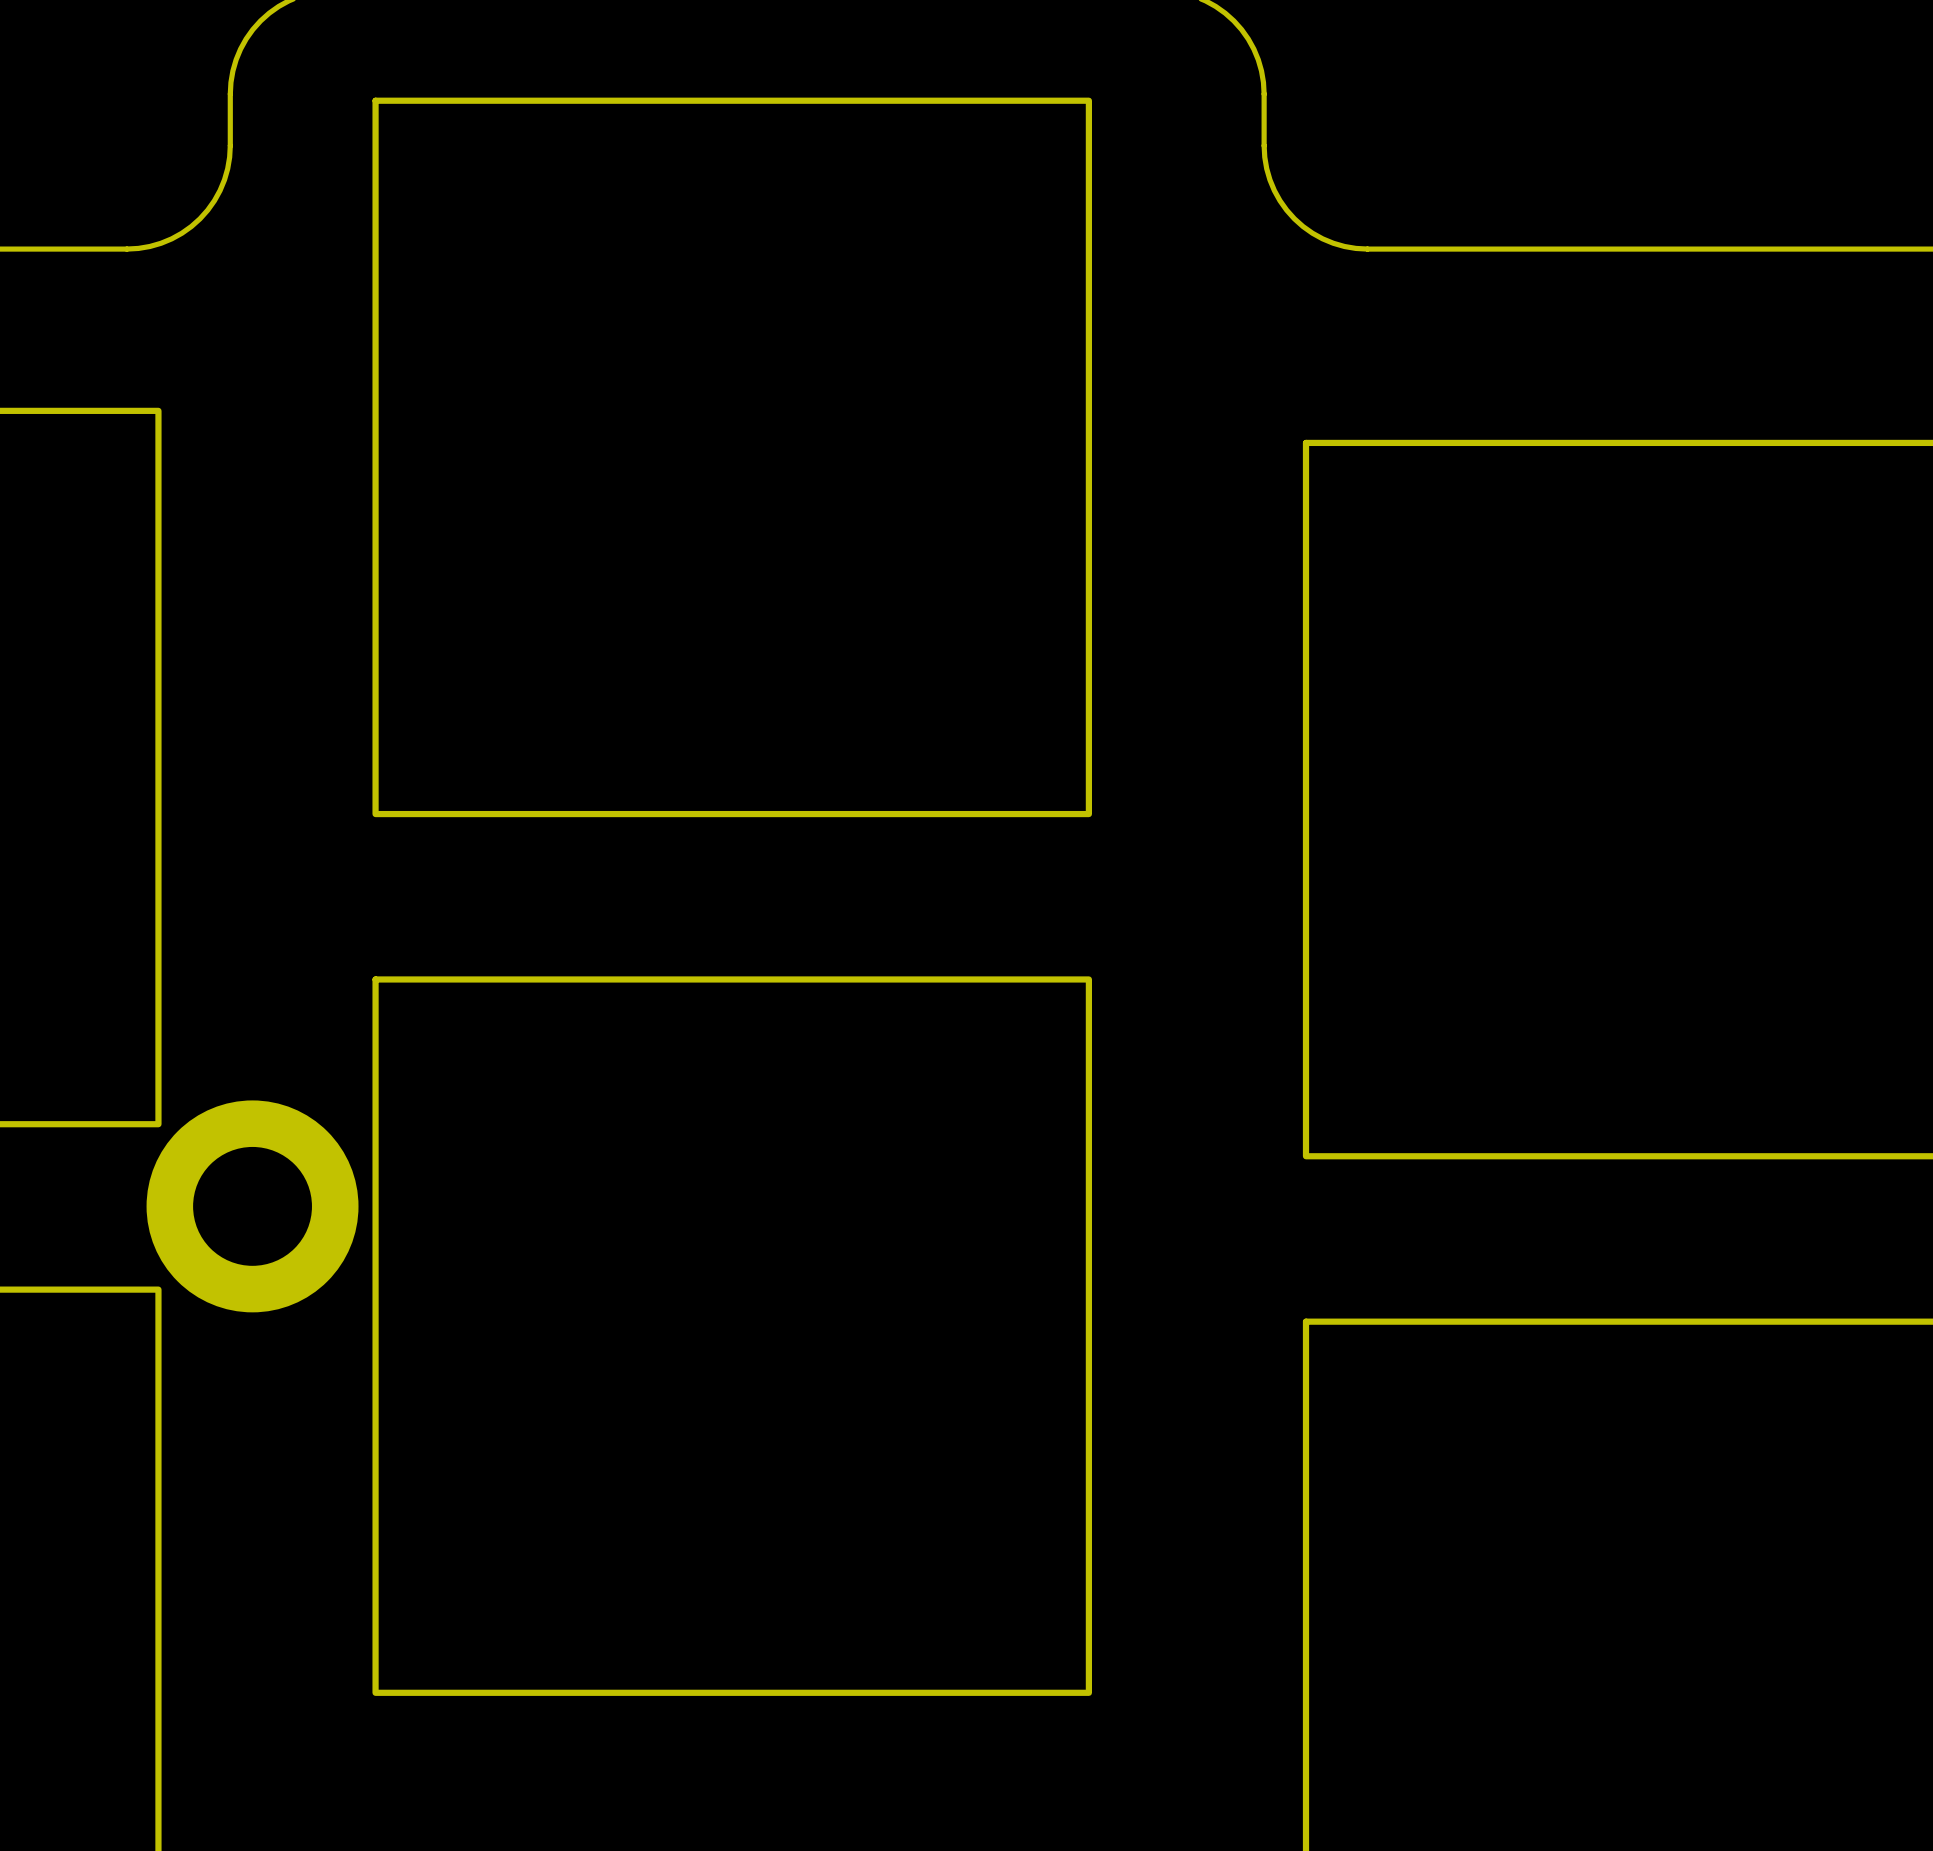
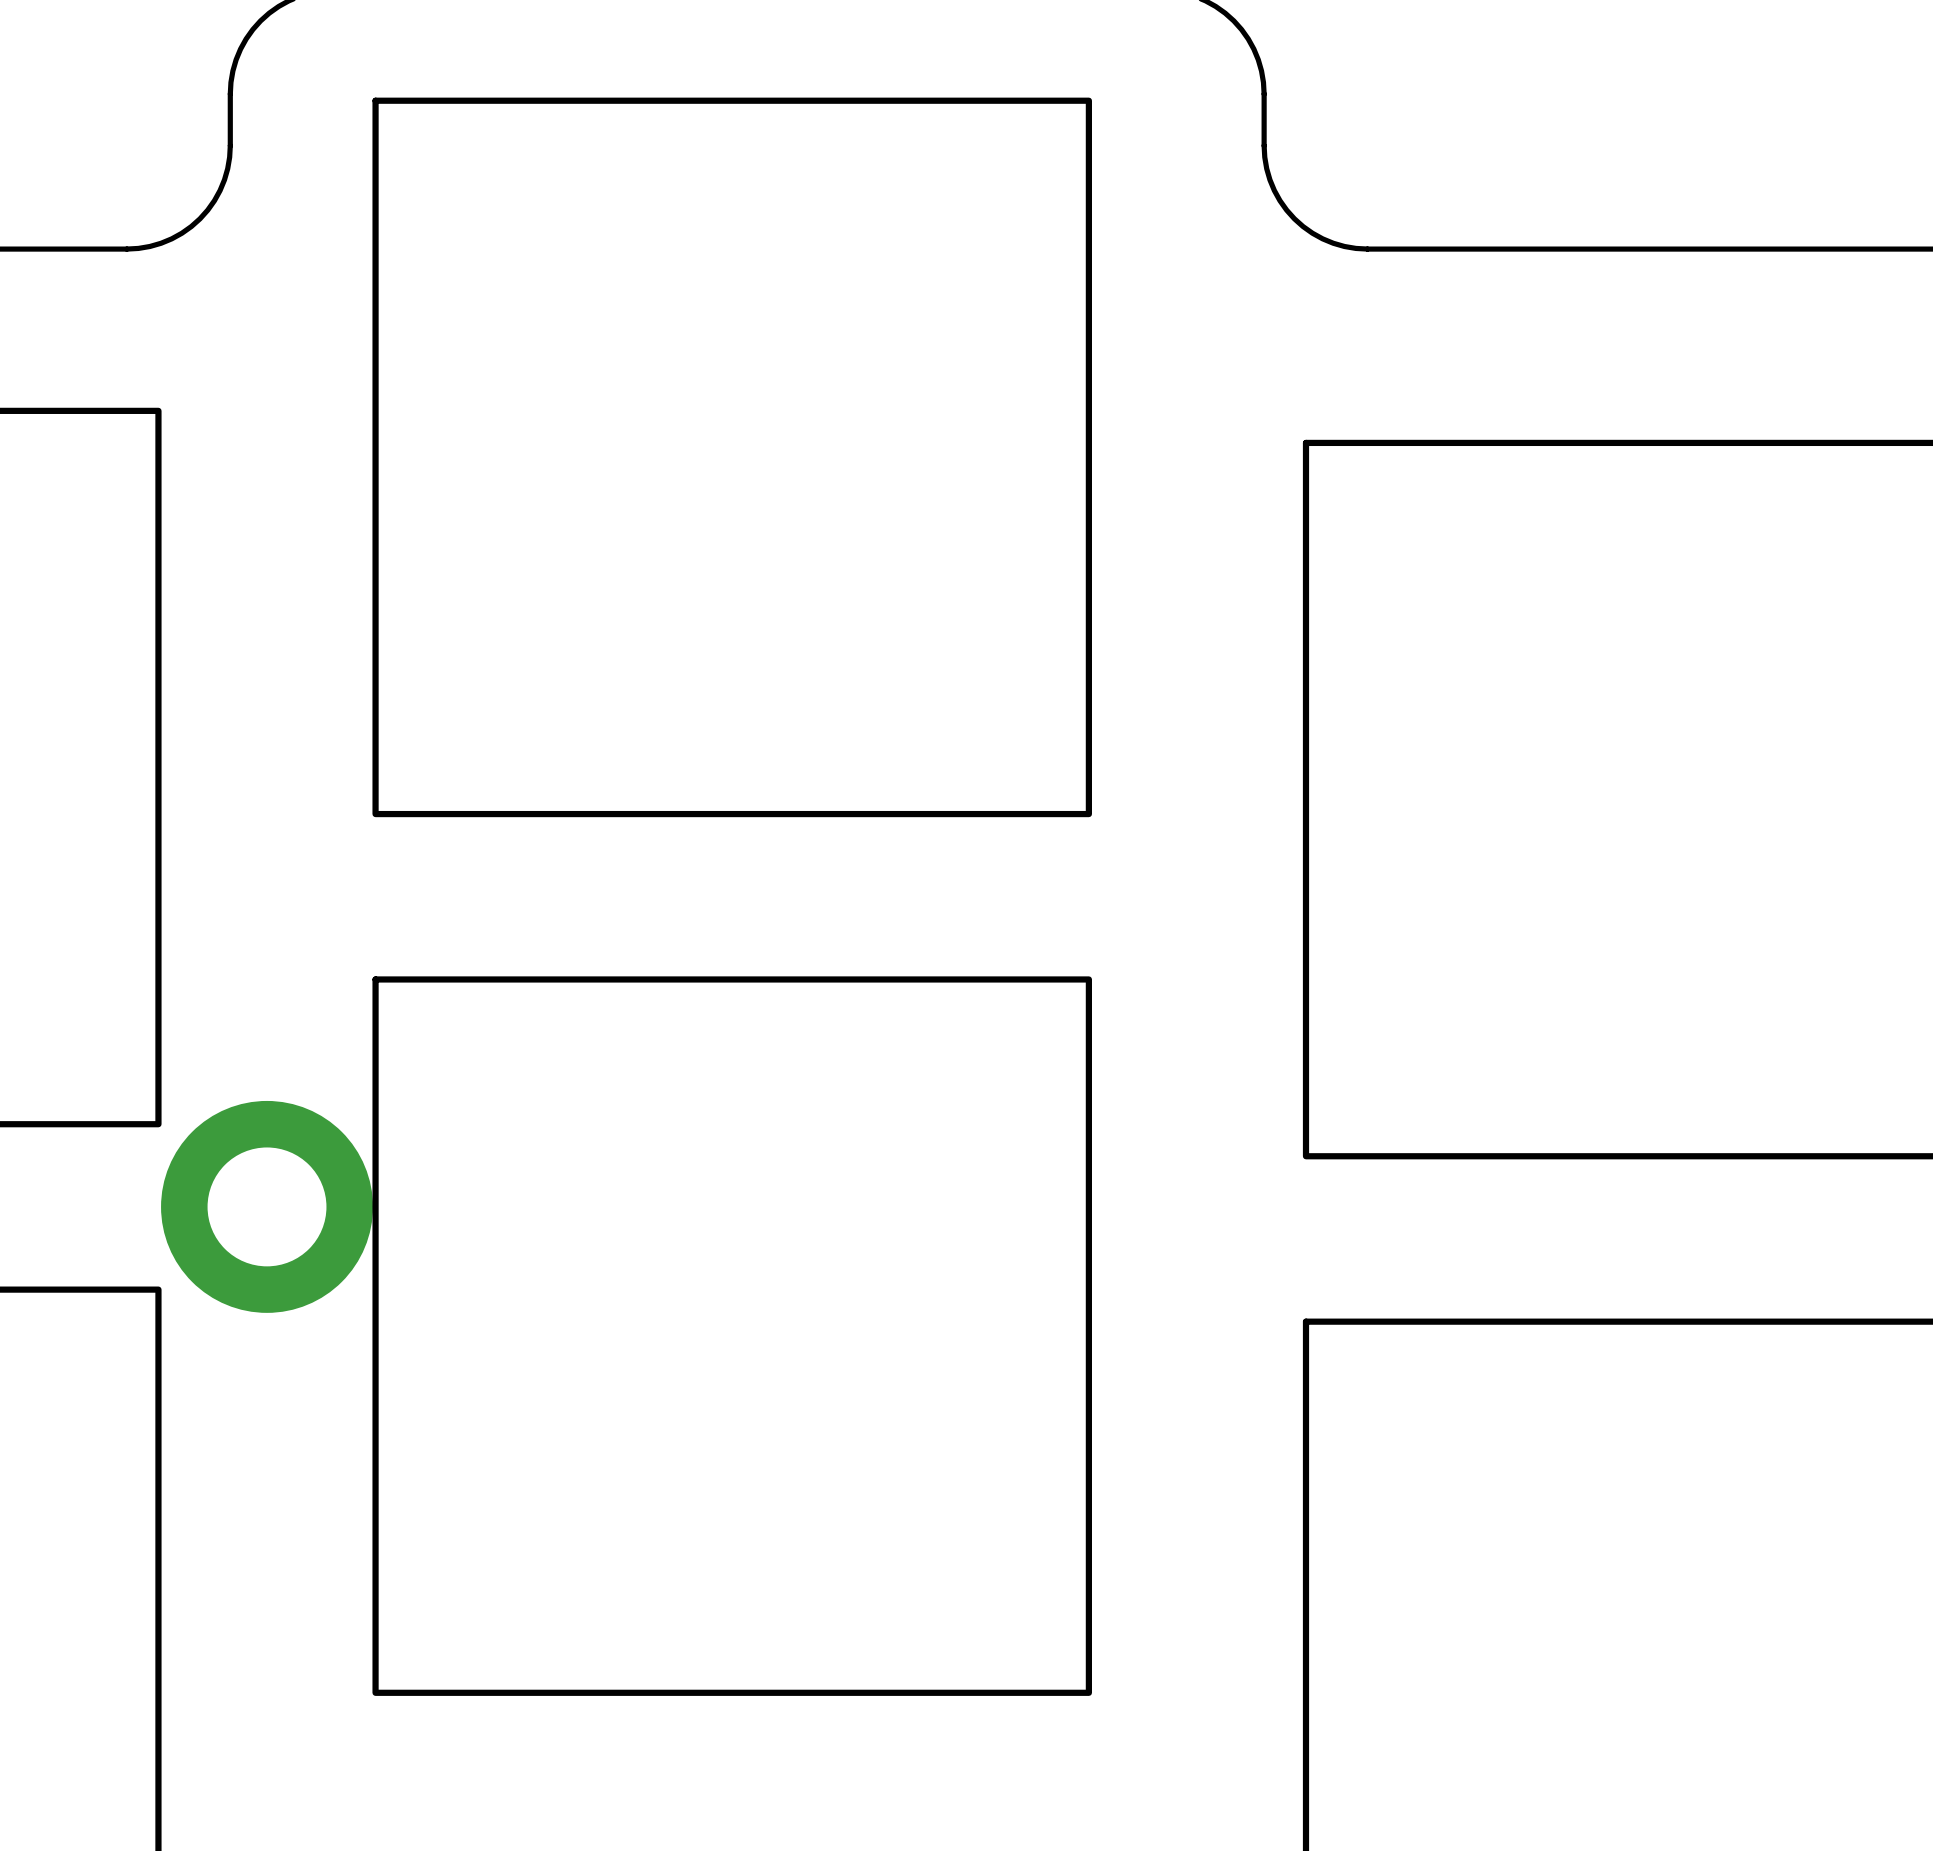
part position: (252, 1206) -> (267, 1206)

